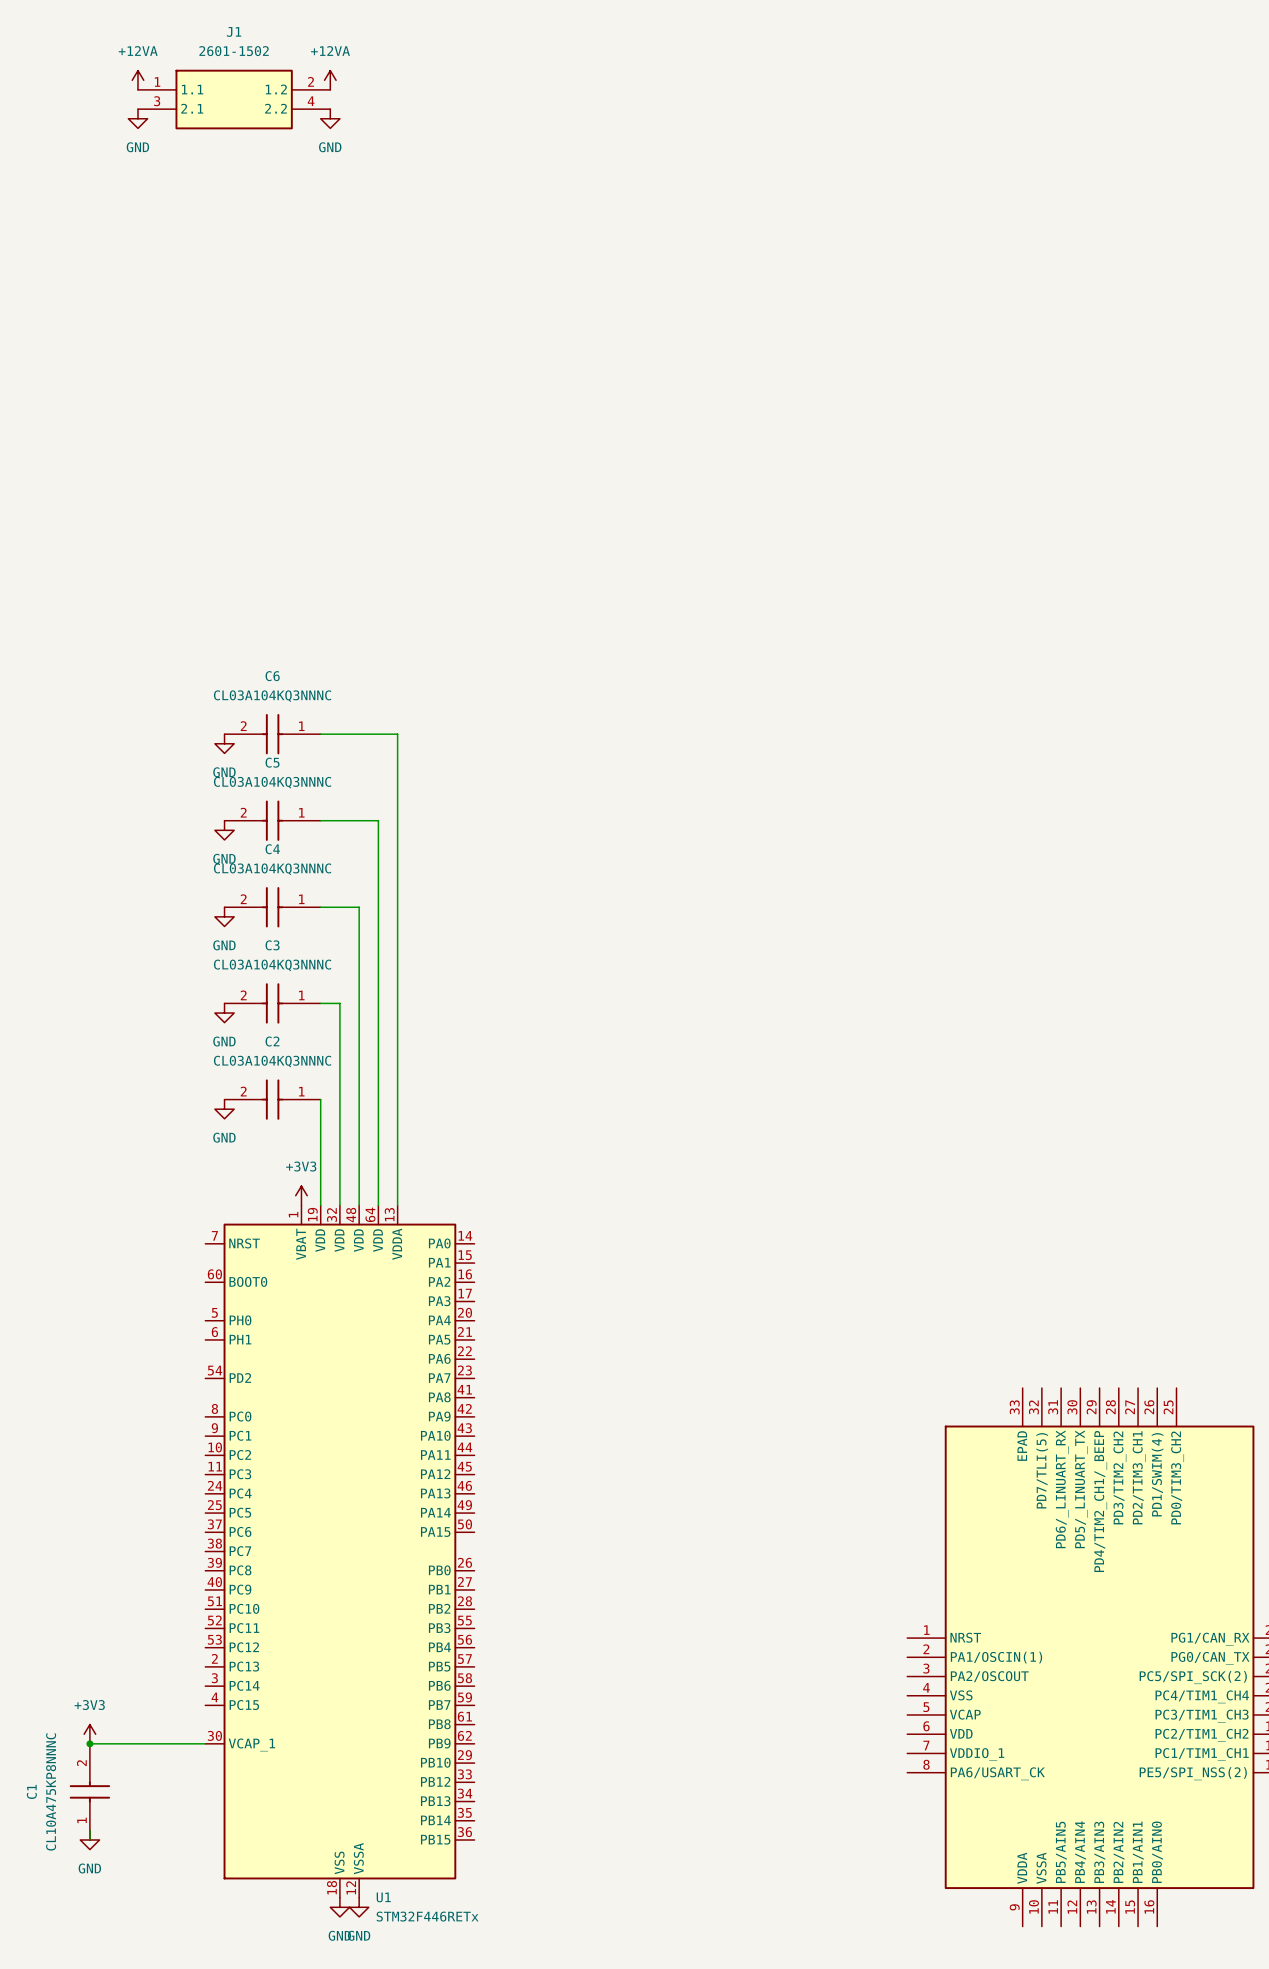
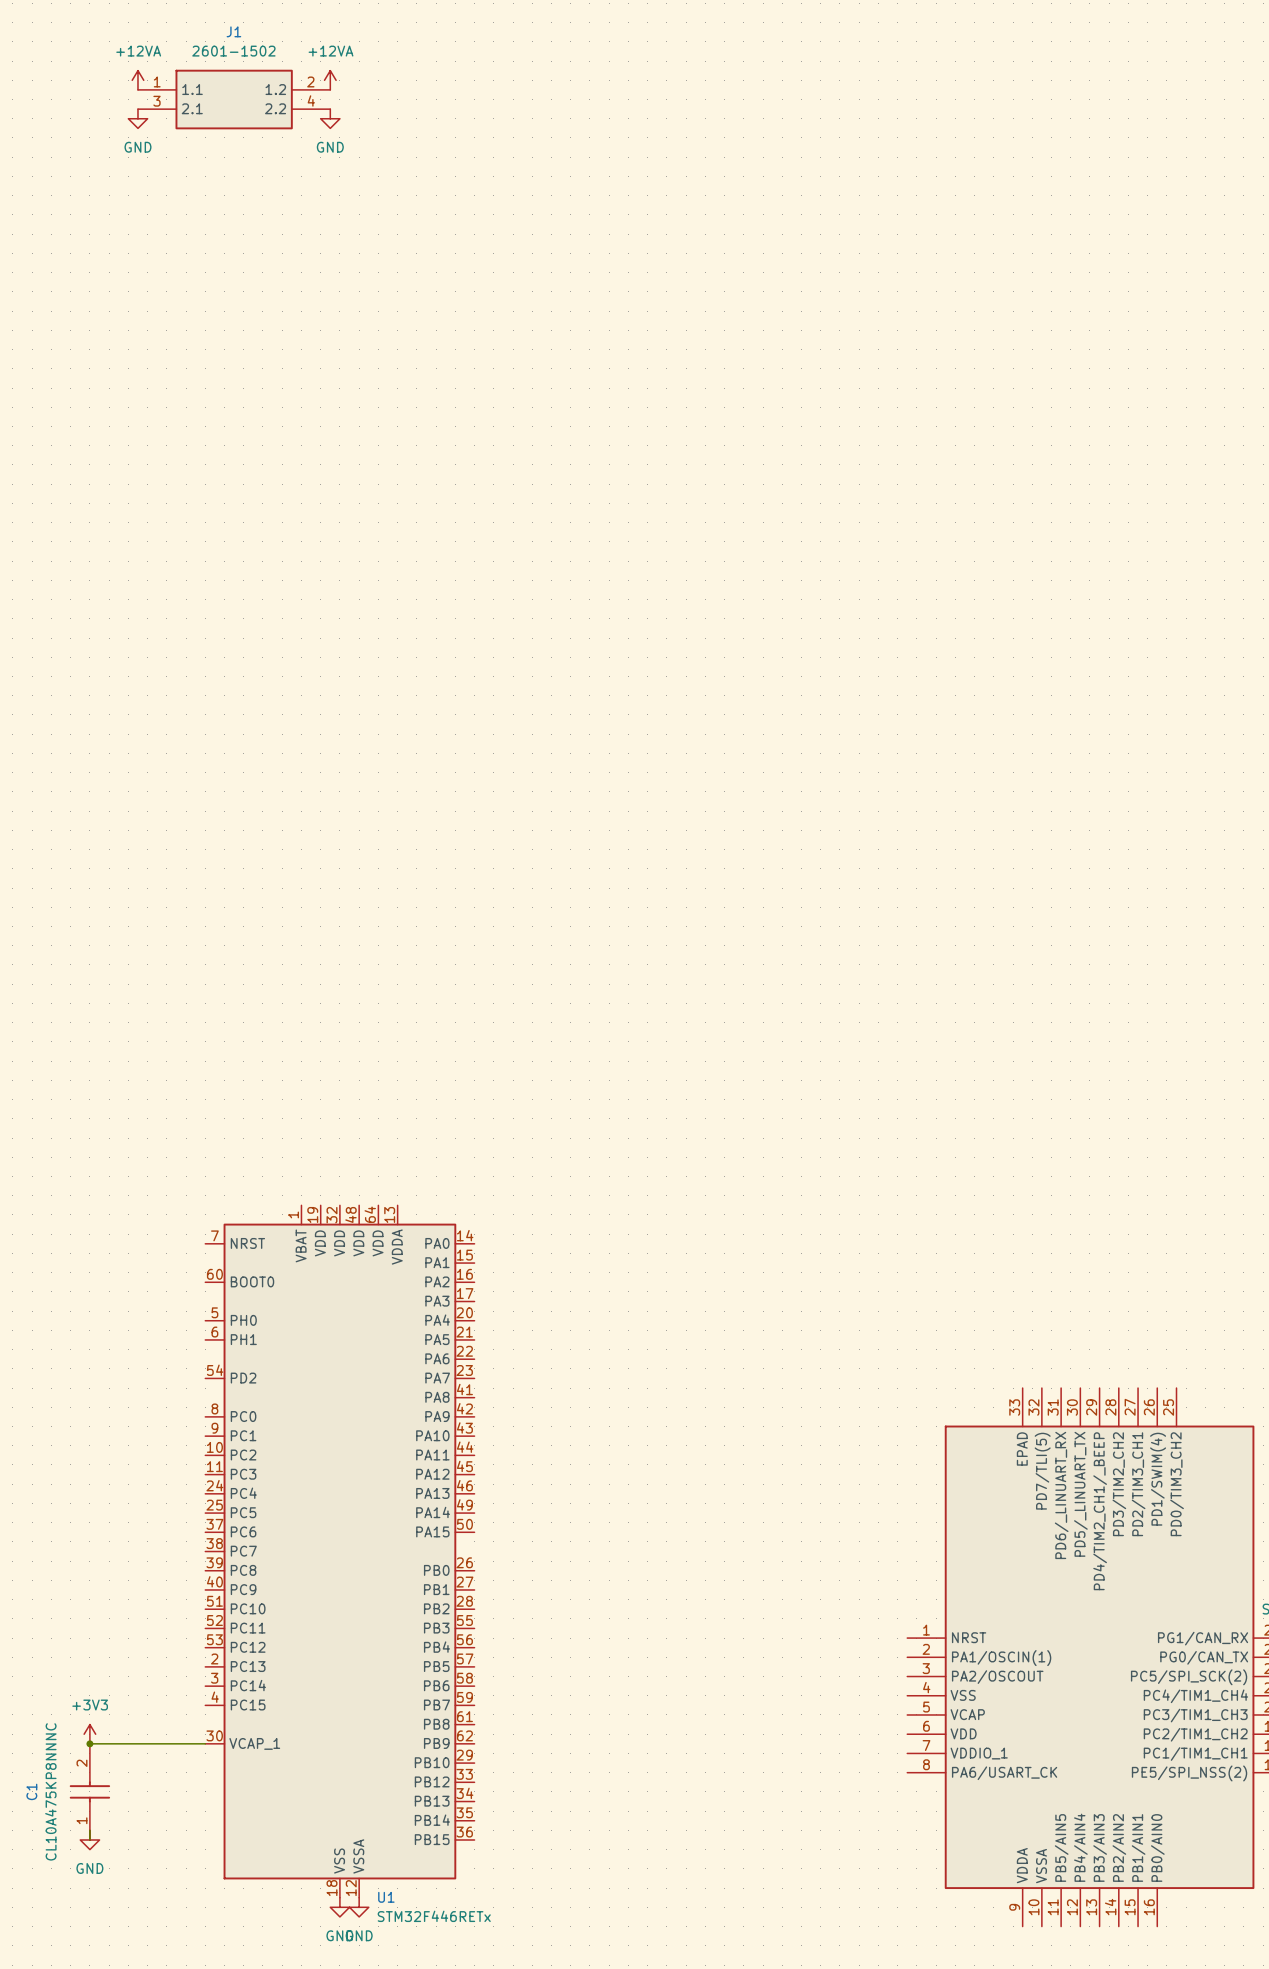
C6: CL03A104KQ3NNNC (272, 734) -> none
wire: (320, 734) (397, 734) (397, 1205) -> none
power symbol: GND (224, 743) -> none
C5: CL03A104KQ3NNNC (272, 820) -> none
wire: (320, 820) (378, 820) (378, 1205) -> none
power symbol: GND (224, 830) -> none
C4: CL03A104KQ3NNNC (272, 907) -> none
wire: (320, 907) (359, 907) (359, 1205) -> none
power symbol: GND (224, 916) -> none
C3: CL03A104KQ3NNNC (272, 1003) -> none
wire: (320, 1003) (339, 1003) (339, 1205) -> none
power symbol: GND (224, 1013) -> none
C2: CL03A104KQ3NNNC (272, 1099) -> none
wire: (320, 1099) (320, 1205) -> none
power symbol: GND (224, 1109) -> none
power symbol: +3V3 (301, 1195) -> none

